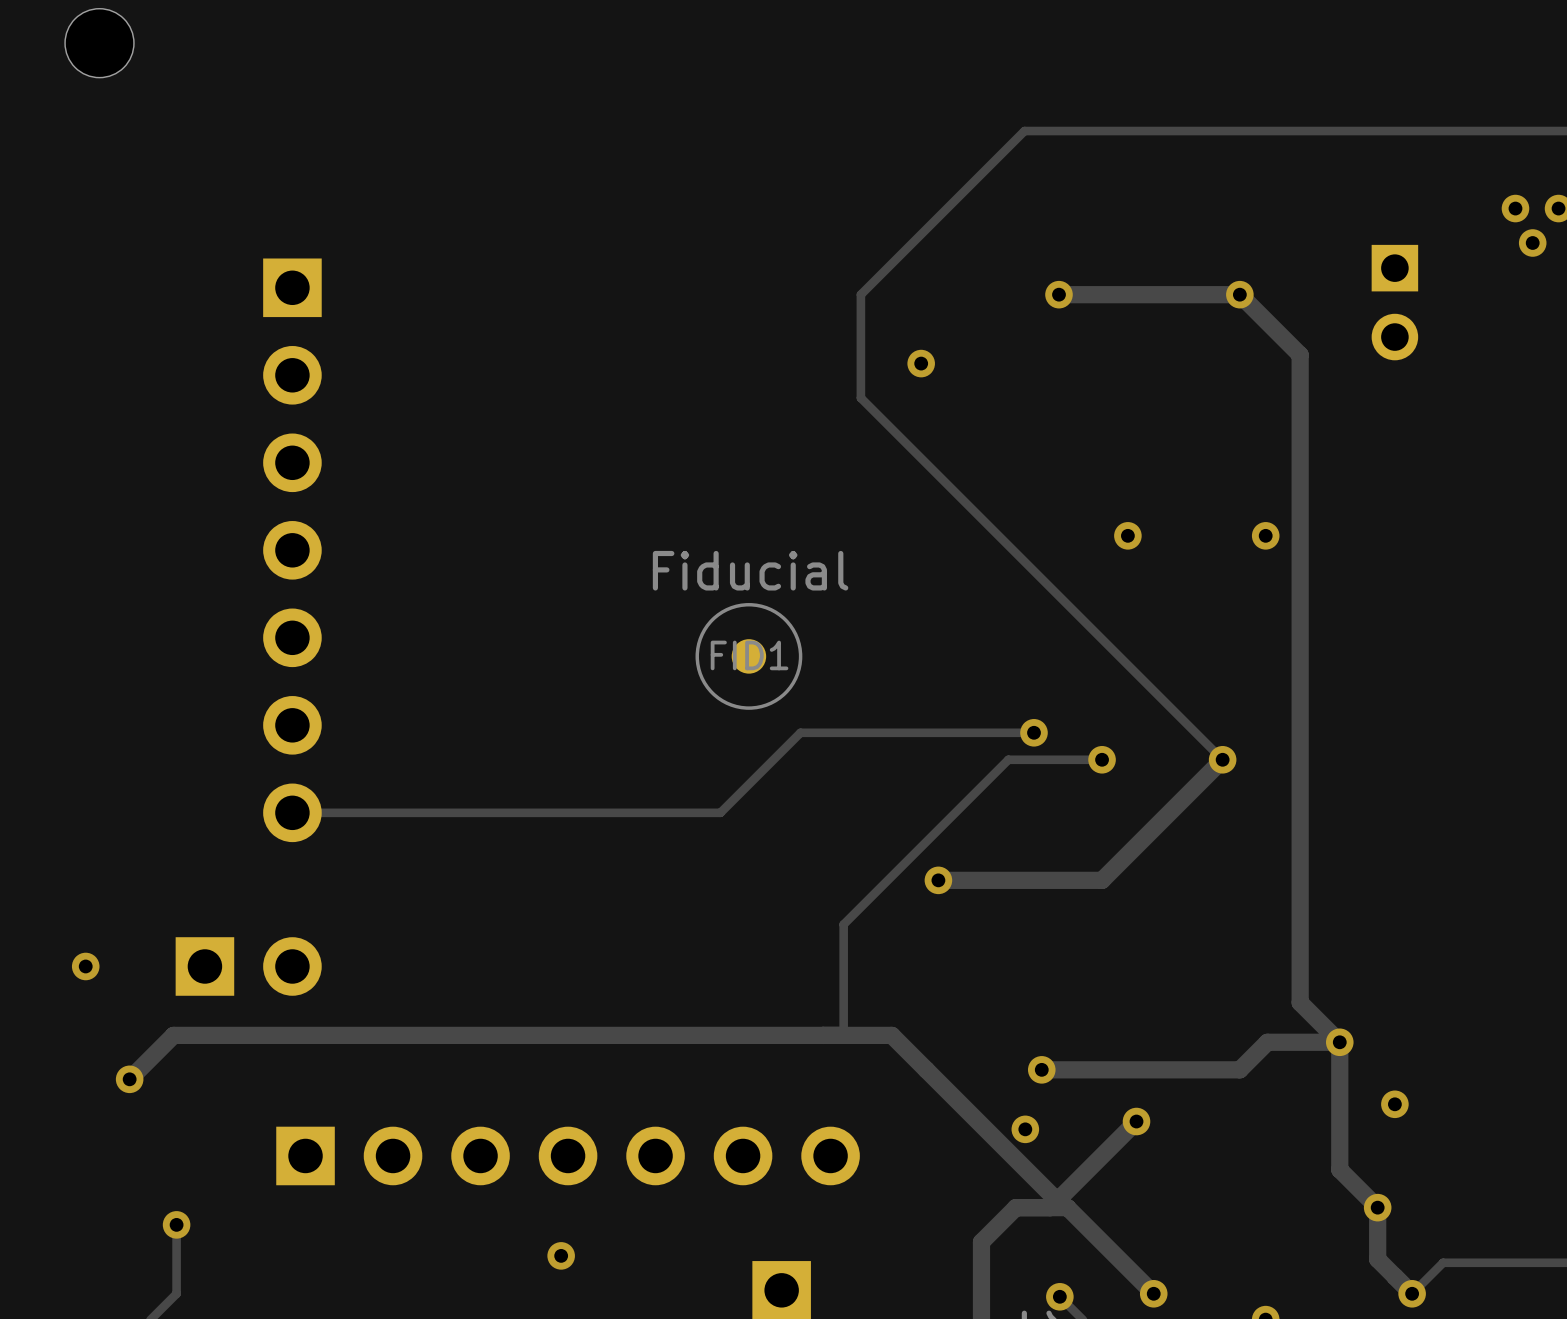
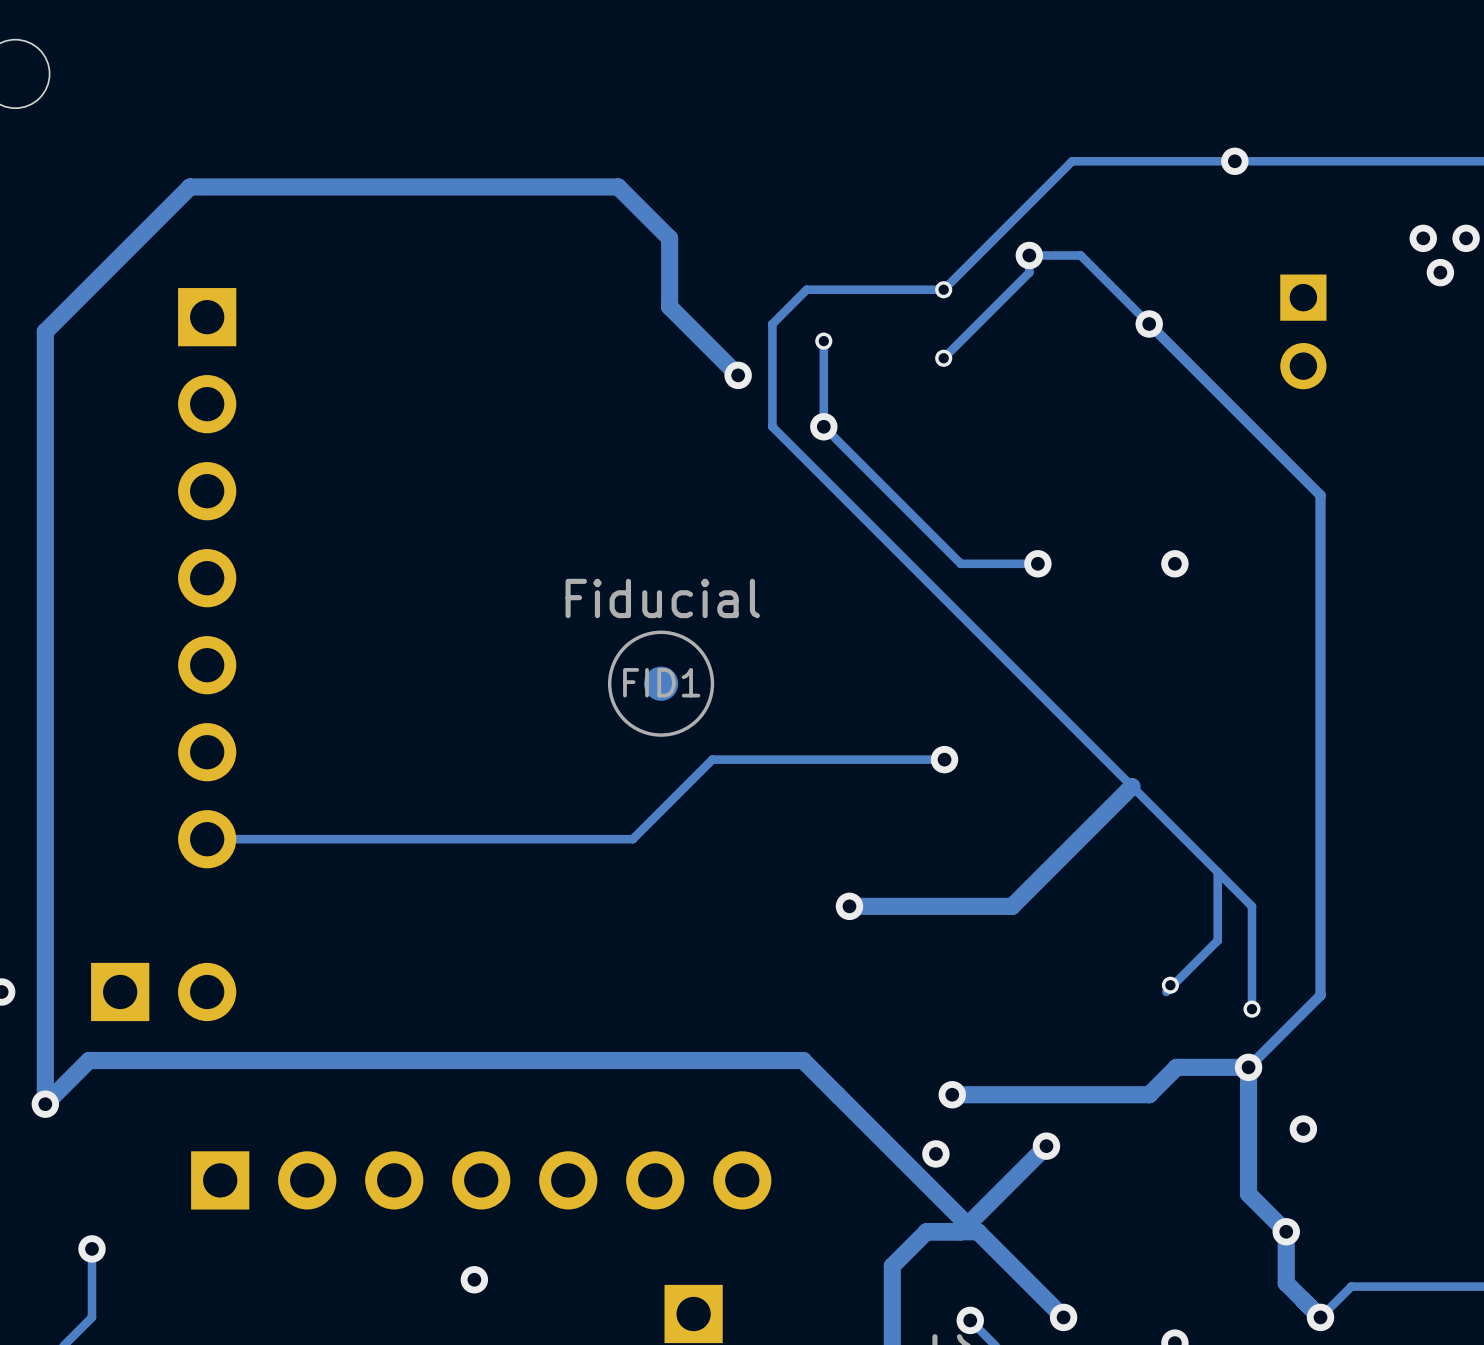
track: (1162, 131) (1024, 131) (895, 260) -> (1072, 161) (943, 289) (806, 289)
via: none -> (1234, 161)
via: none -> (1029, 255)
via: none -> (943, 289)
via: (1058, 294) -> none
track: (1239, 294) (1058, 294) -> (1149, 324) (1080, 255) (1029, 255) (1029, 272) (943, 358)
track width: thick (1239, 294) (1300, 354) -> thin (1149, 324) (1209, 383)
track: none -> (823, 341) (823, 426) (960, 563) (1037, 563)
via: none -> (823, 341)
via: none -> (943, 358)
track: none -> (738, 375) (669, 306) (669, 238) (618, 186) (190, 186) (45, 331) (45, 1104)
via: none -> (738, 375)
track: (1300, 354) (1300, 1002) (1339, 1042) -> (1209, 383) (1320, 495) (1320, 995) (1248, 1067)
via position: (921, 363) -> (823, 426)
track: (1102, 759) (1008, 759) (843, 924) (843, 1035) -> none
via: (1102, 759) -> none
track: none -> (1132, 786) (1251, 906) (1251, 1009)
via: (1222, 759) -> none
track: none -> (1217, 872) (1217, 940) (1166, 991)
via: none -> (1170, 985)
via: none -> (1251, 1009)

